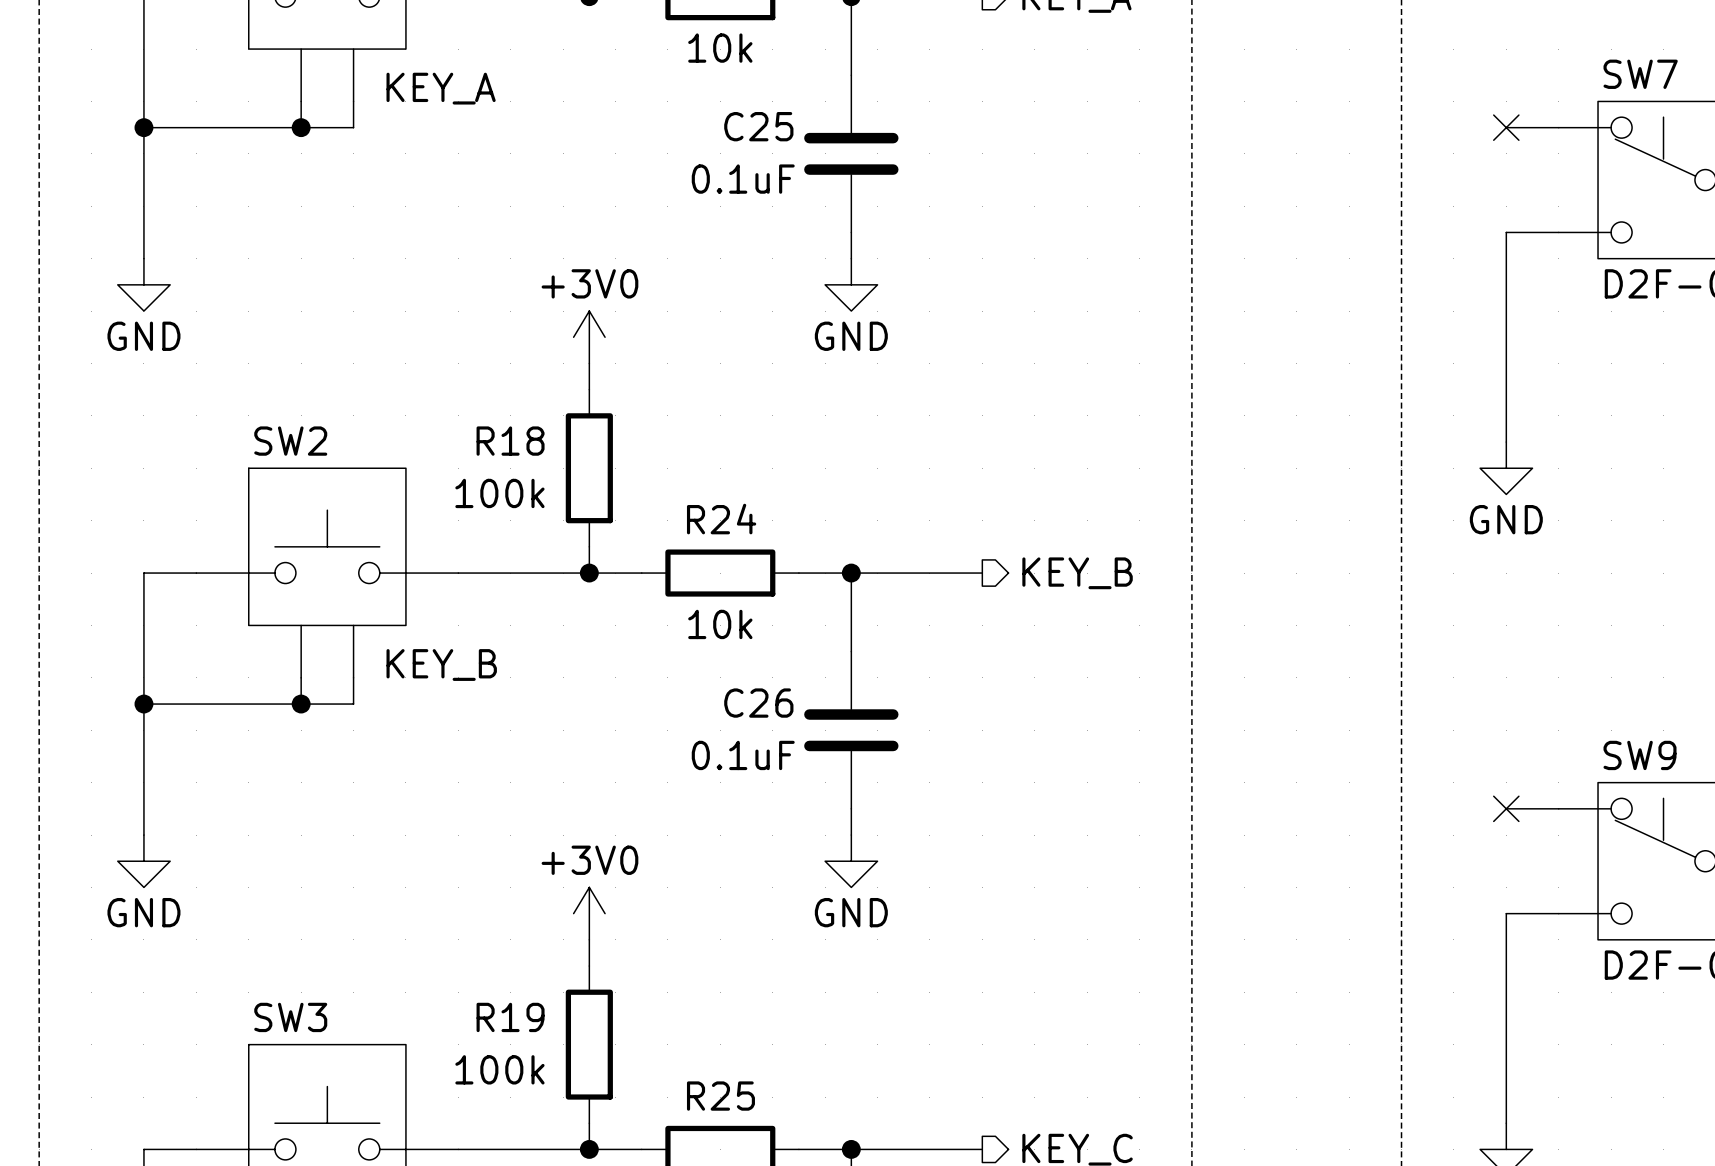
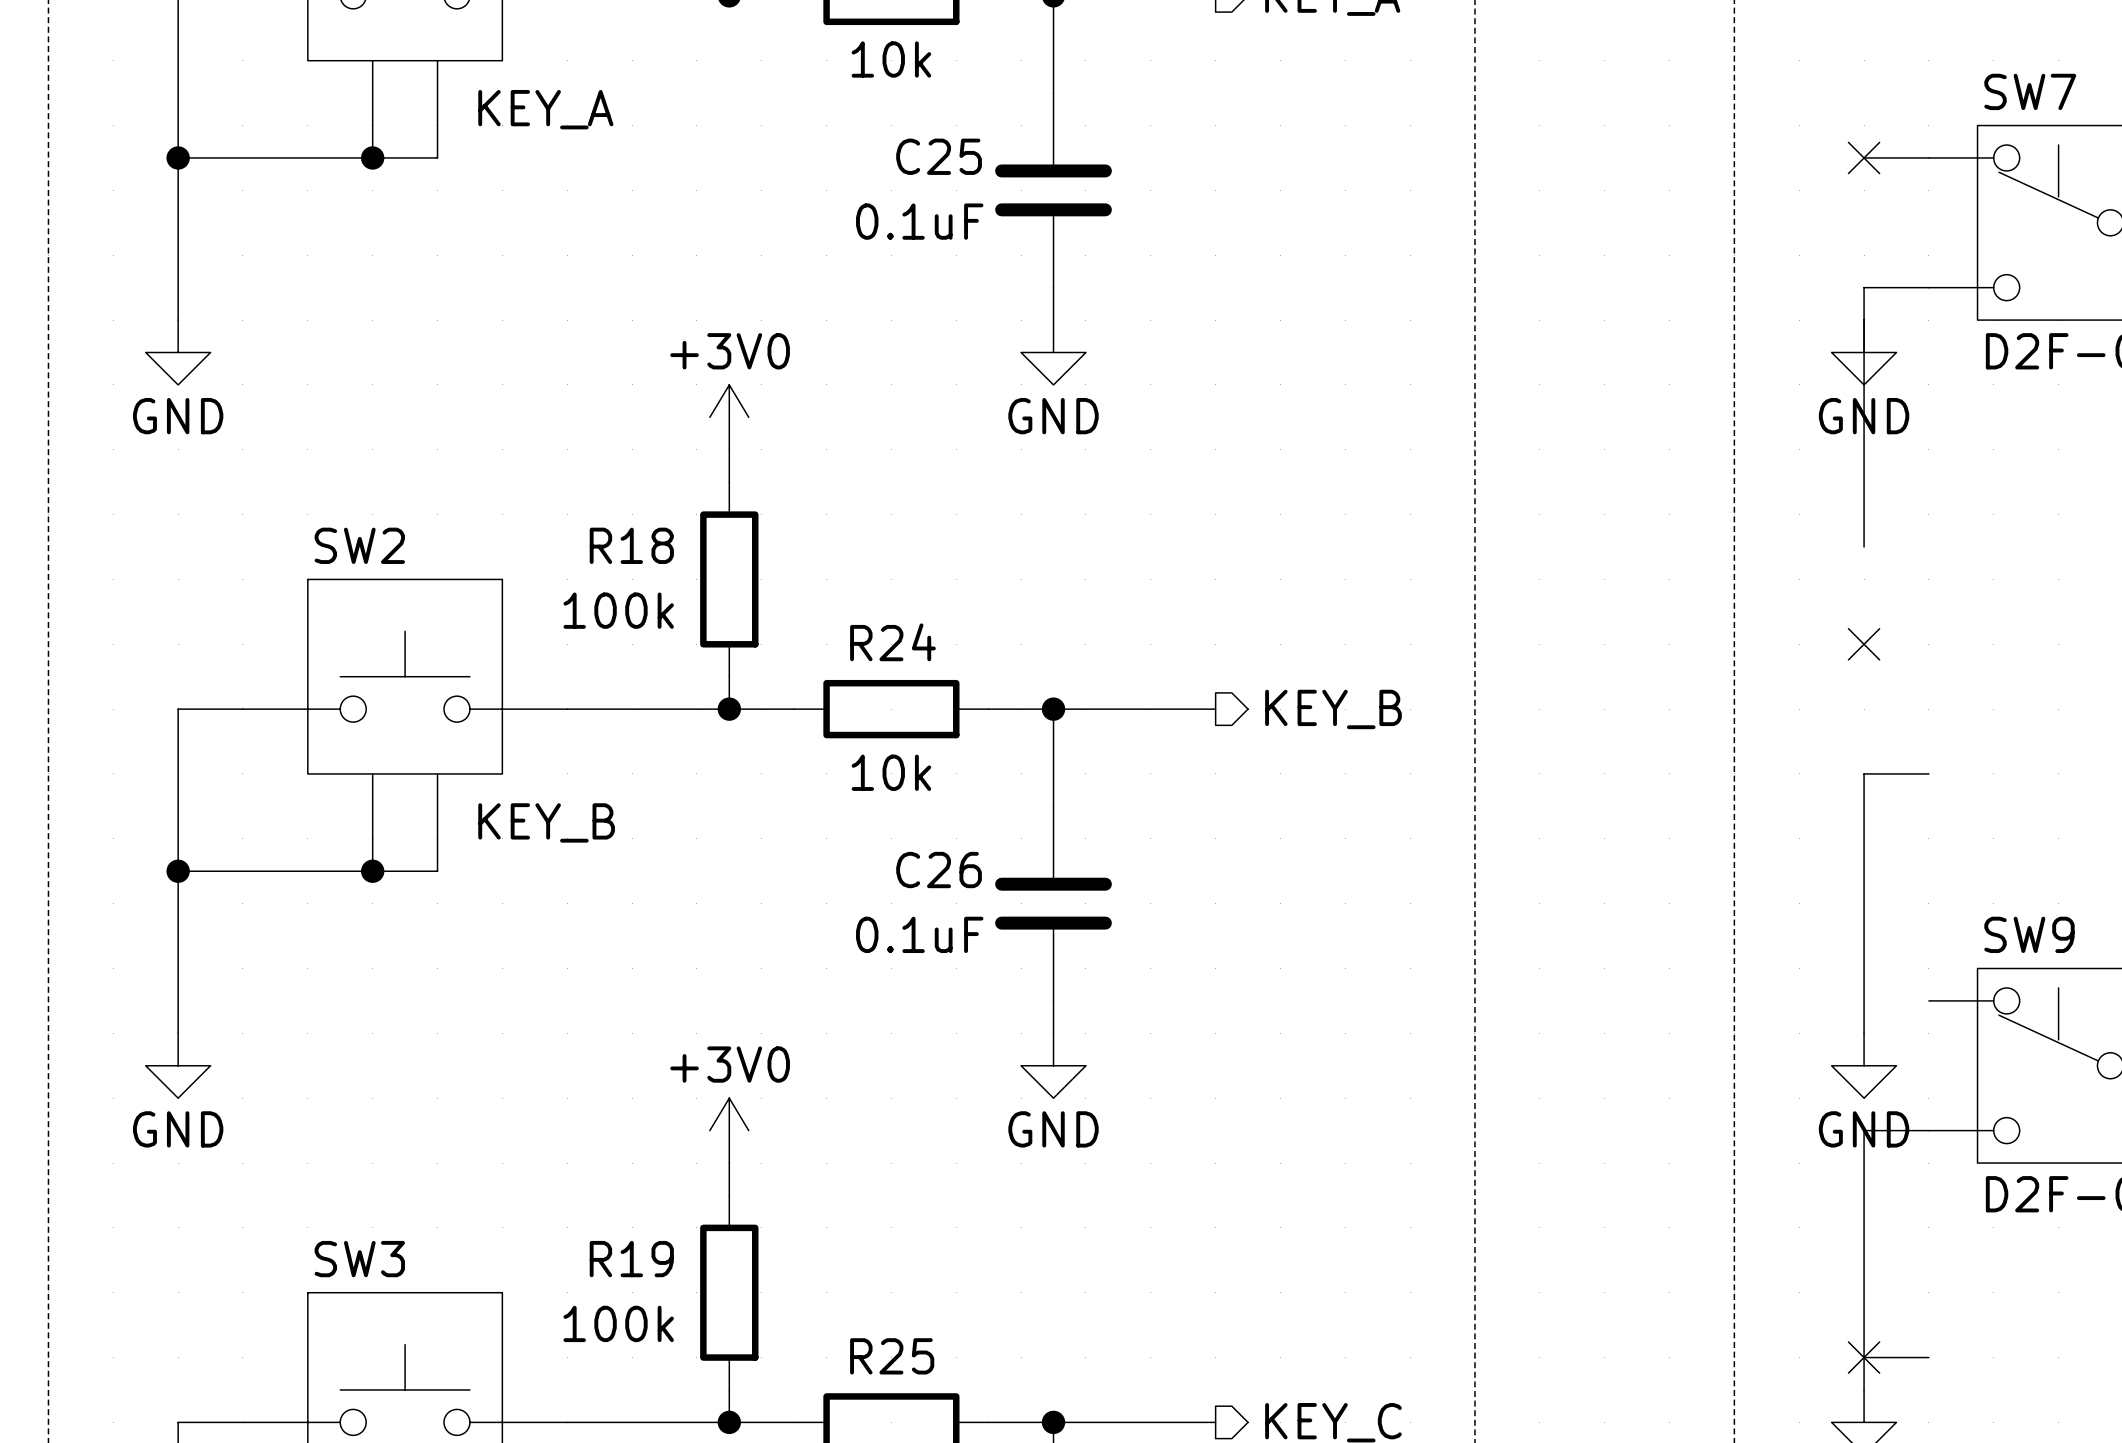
power symbol position: GND (1506, 468) -> GND (1864, 352)
no-connect mark: none -> (1864, 644)
wire: none -> (1928, 773) (1864, 773) (1864, 1033)
wire: (1506, 808) (1558, 808) -> (1864, 1357) (1928, 1357)
no-connect mark: (1506, 808) -> none
power symbol: none -> GND (1864, 1065)
no-connect mark: none -> (1864, 1357)

